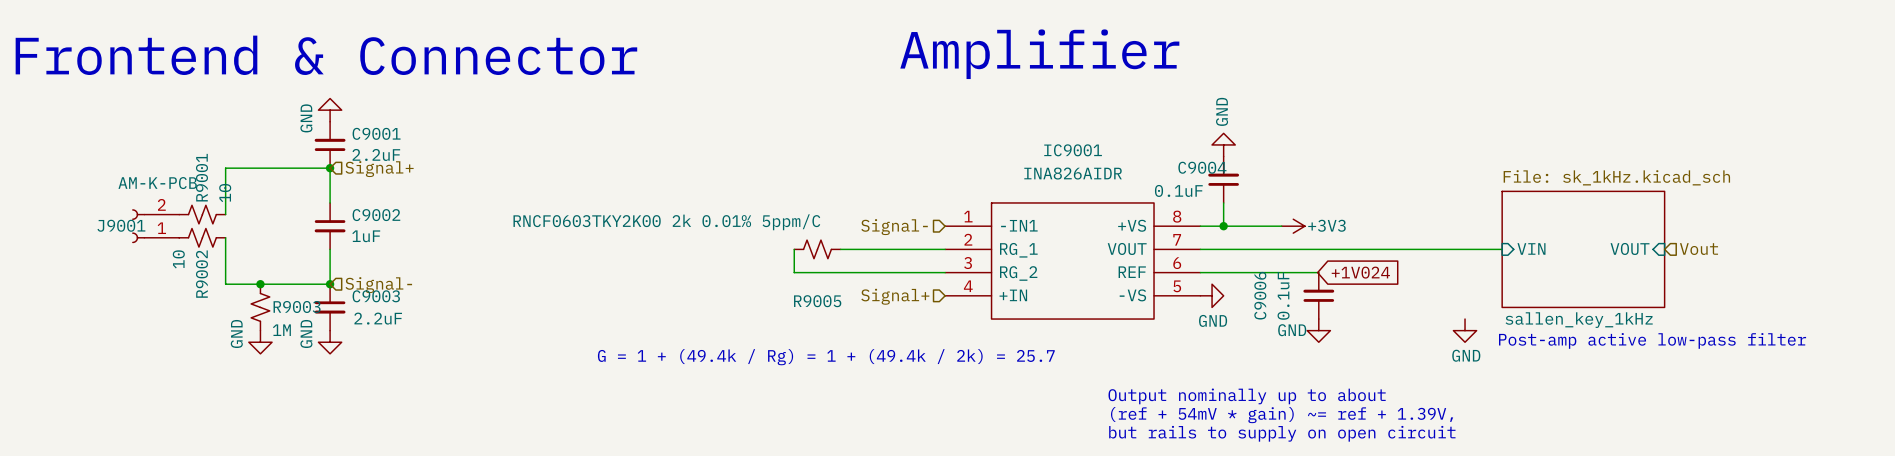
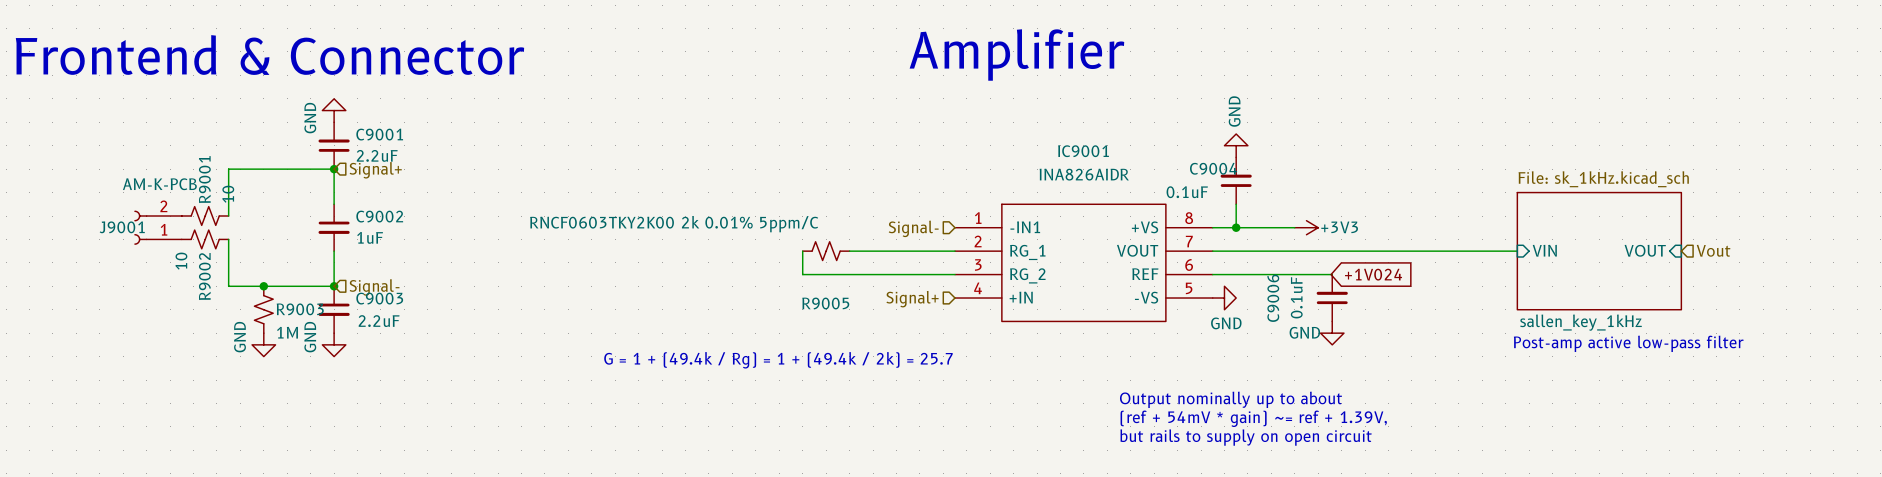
power symbol: GND (1465, 330) -> none

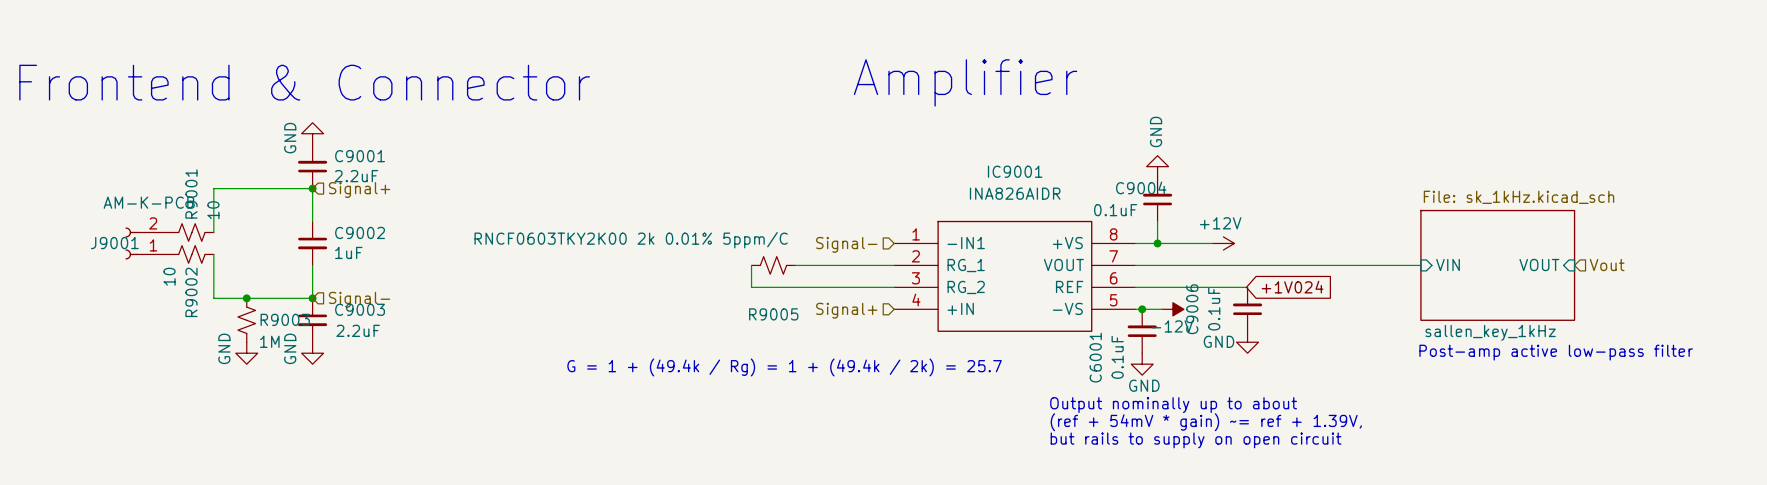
power symbol: +3V3 (1306, 227) -> +12V (1223, 243)
junction: none -> (1142, 309)
power symbol rotation: 0° (1224, 298) -> 90° clockwise (1142, 364)
power symbol position: GND (1224, 298) -> GND (1142, 364)
power symbol: none -> -12V (1172, 309)
C6001: none -> 0.1uF (1142, 331)

